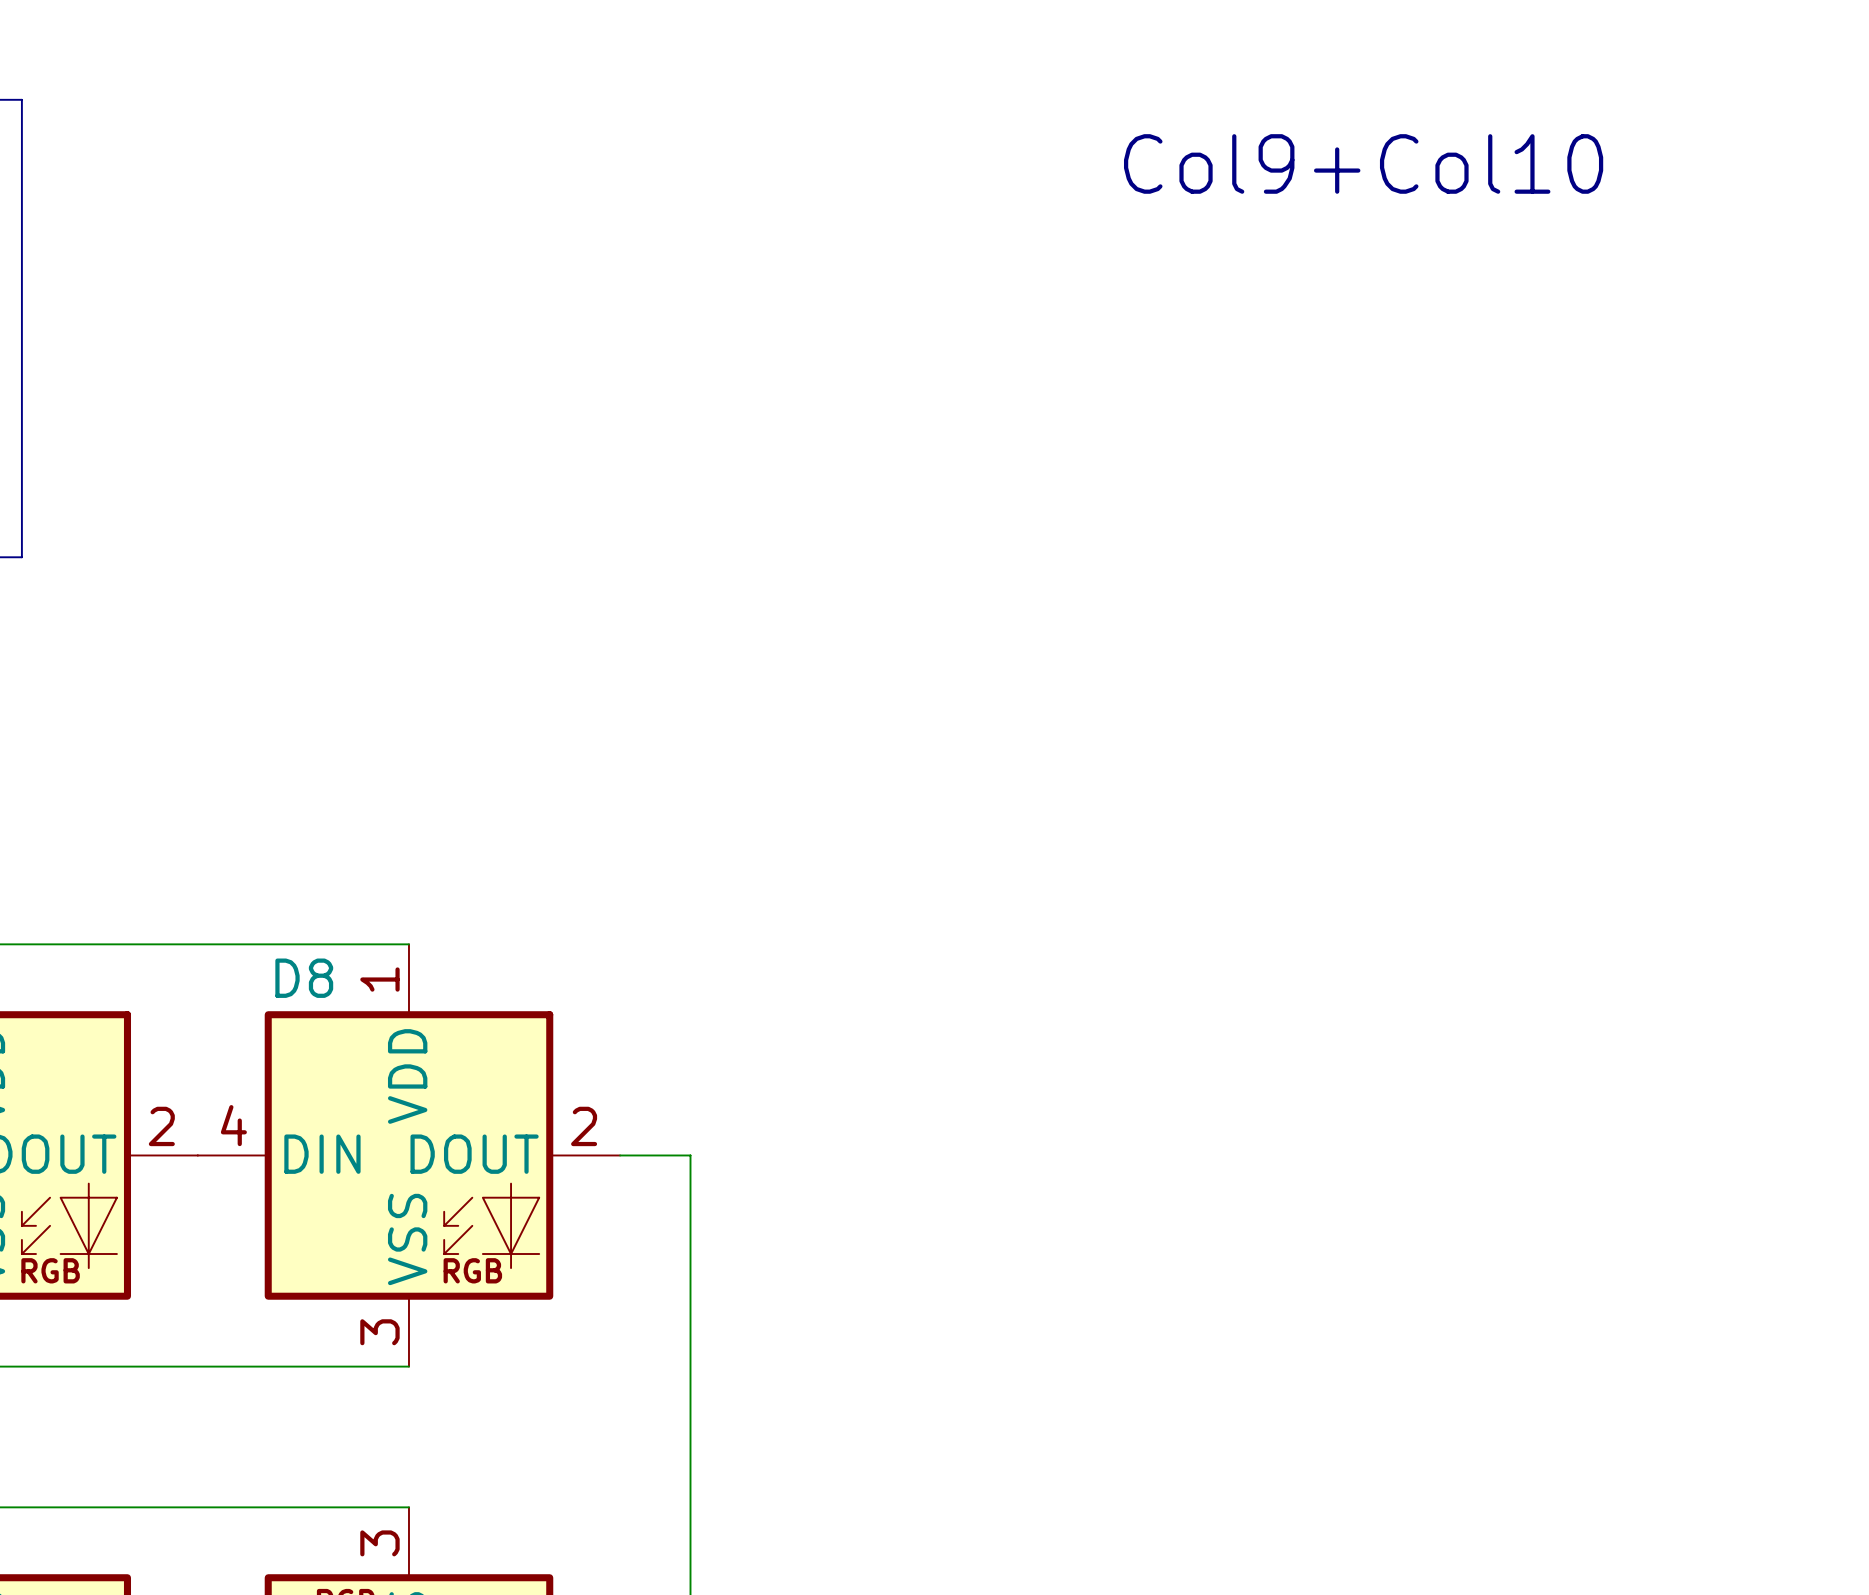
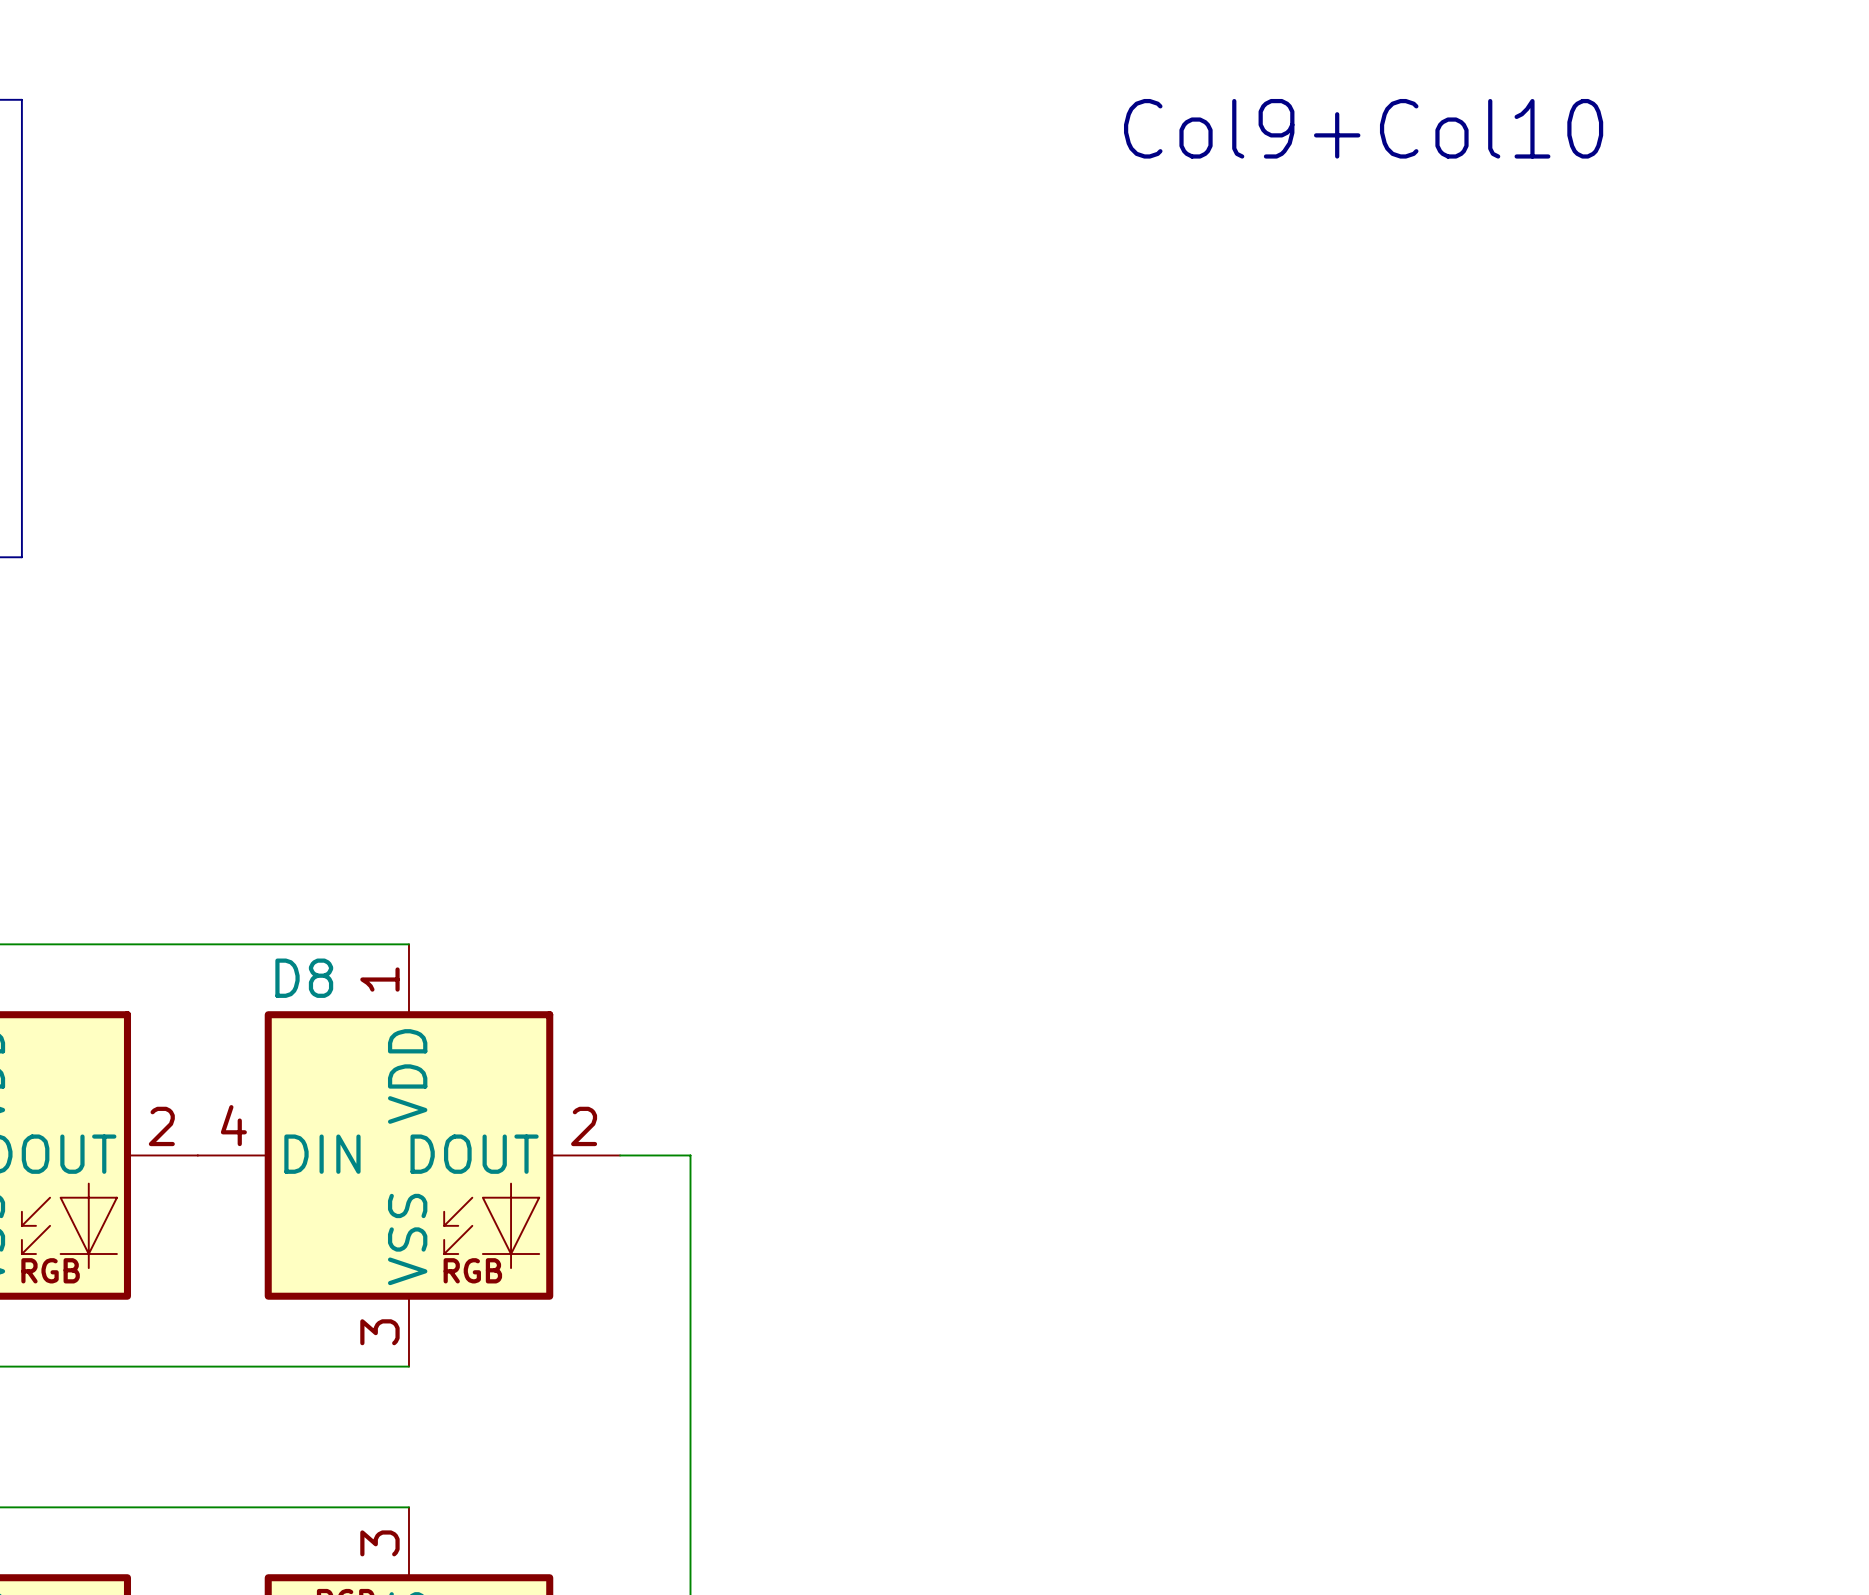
text position: Col9+Col10 (1363, 163) -> Col9+Col10 (1363, 128)

